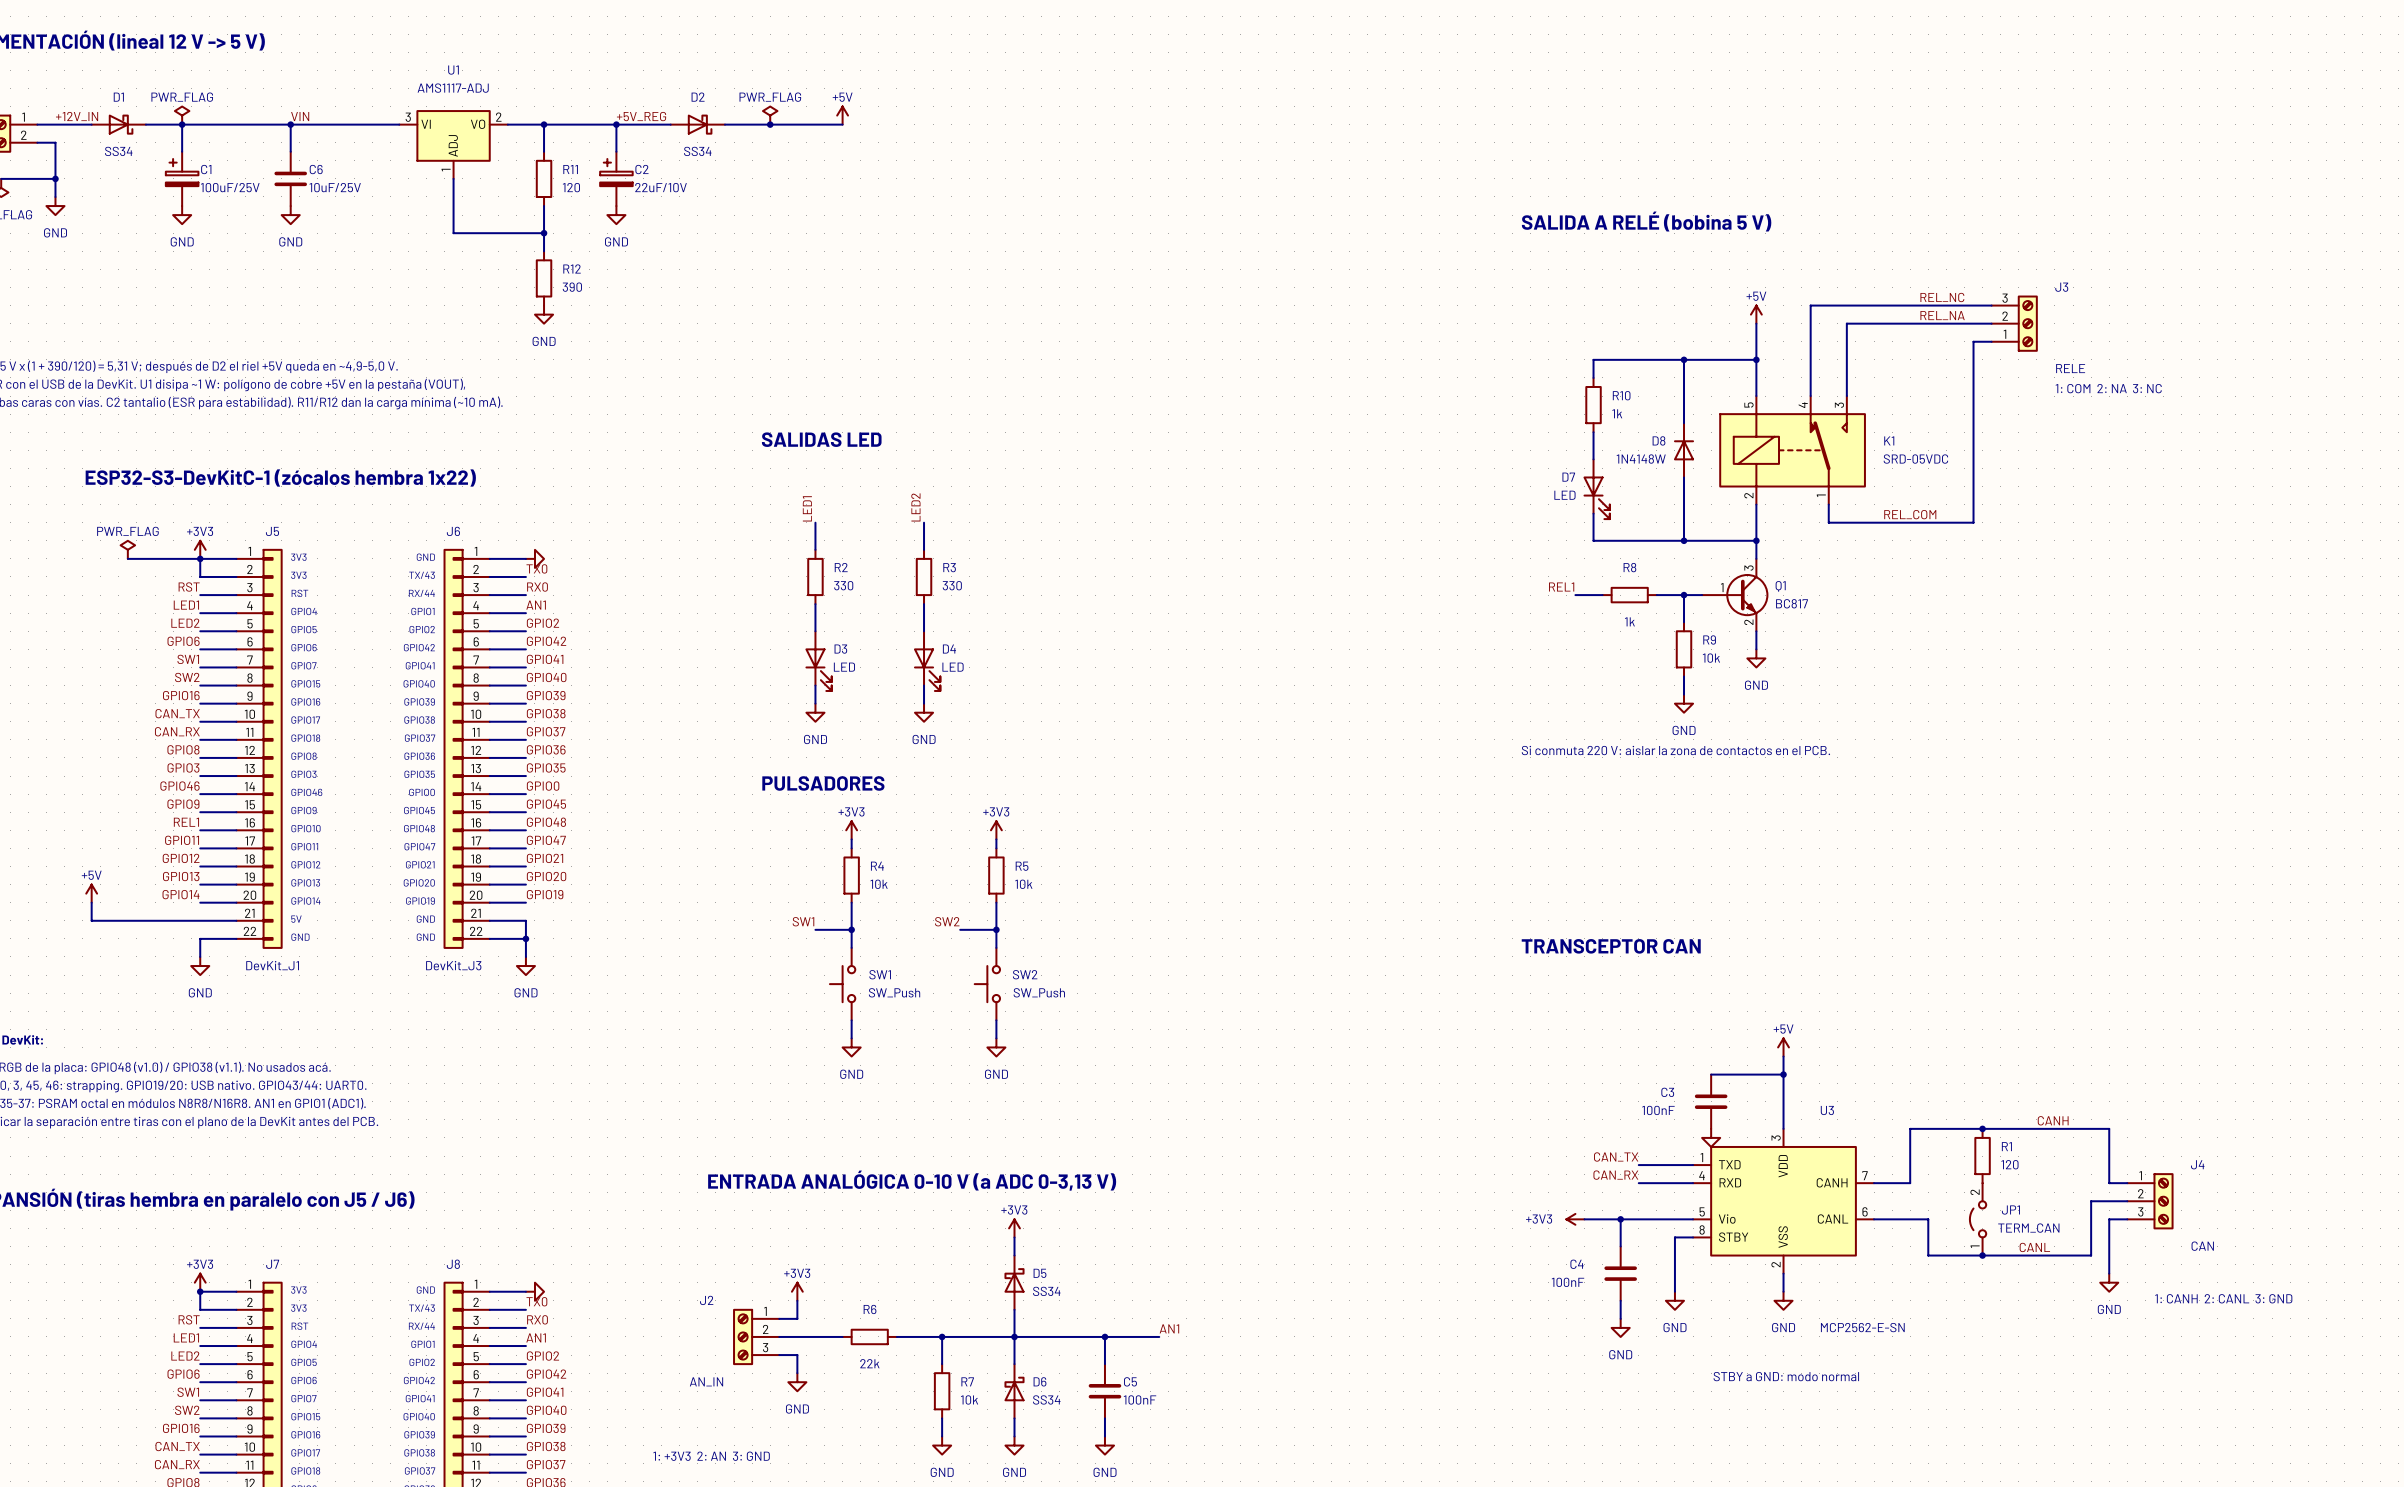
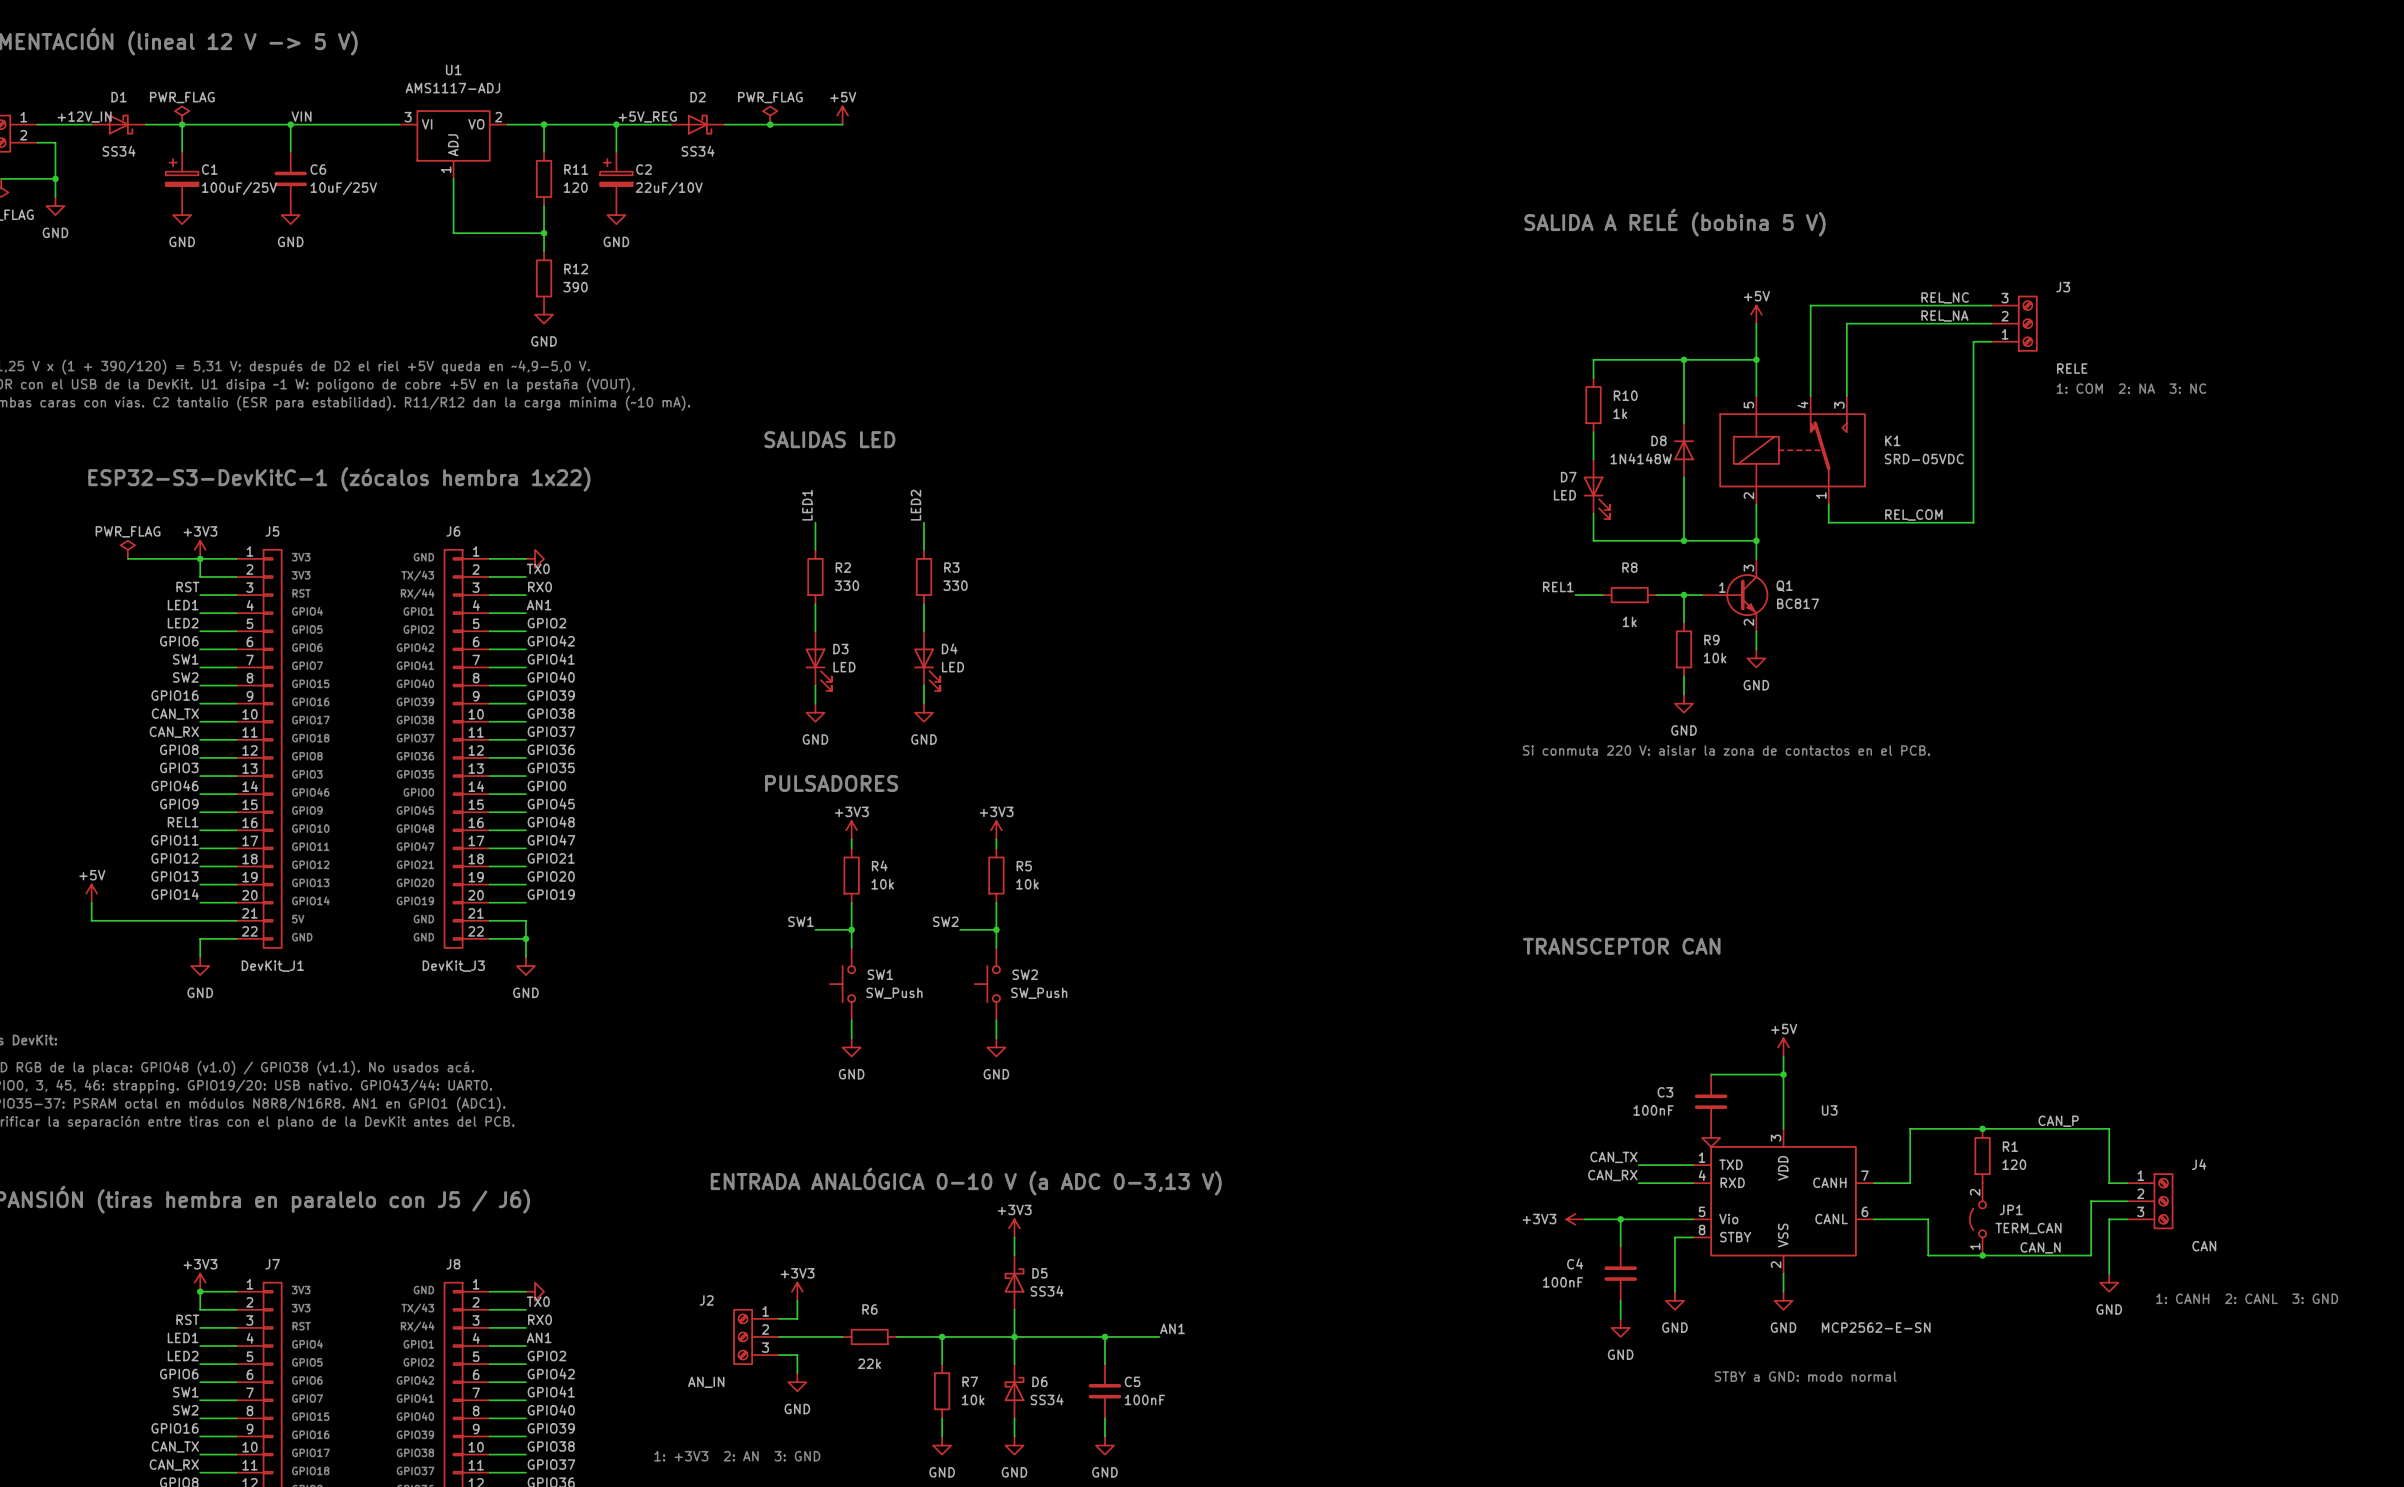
label: CANH (2053, 1120) -> CAN_P (2058, 1121)
label: CANL (2034, 1247) -> CAN_N (2040, 1247)

